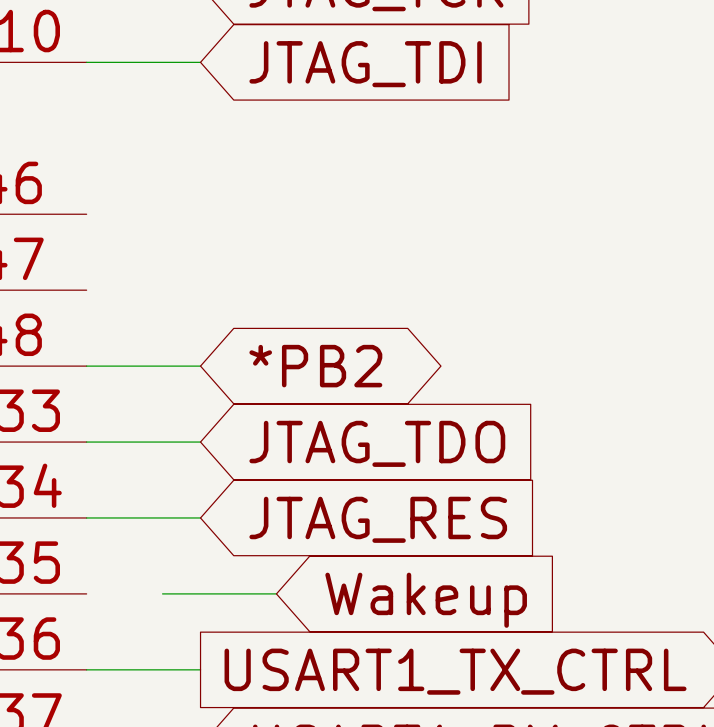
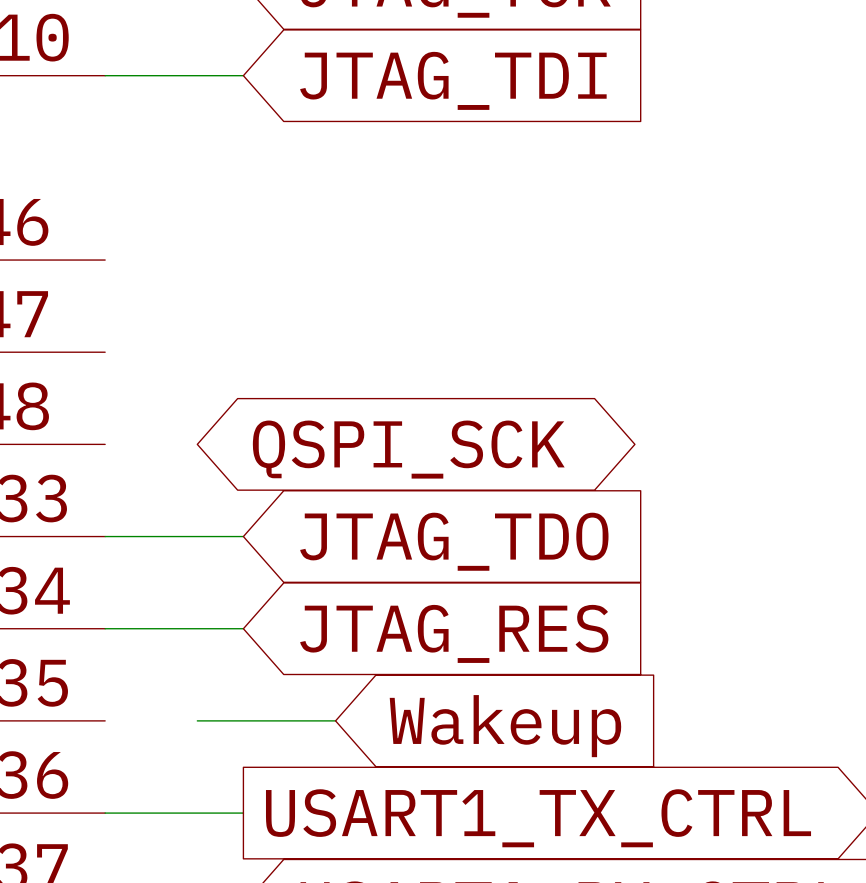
wire: (86, 366) (200, 366) -> none
global label: *PB2 (315, 366) -> none
global label: none -> QSPI_SCK (408, 449)

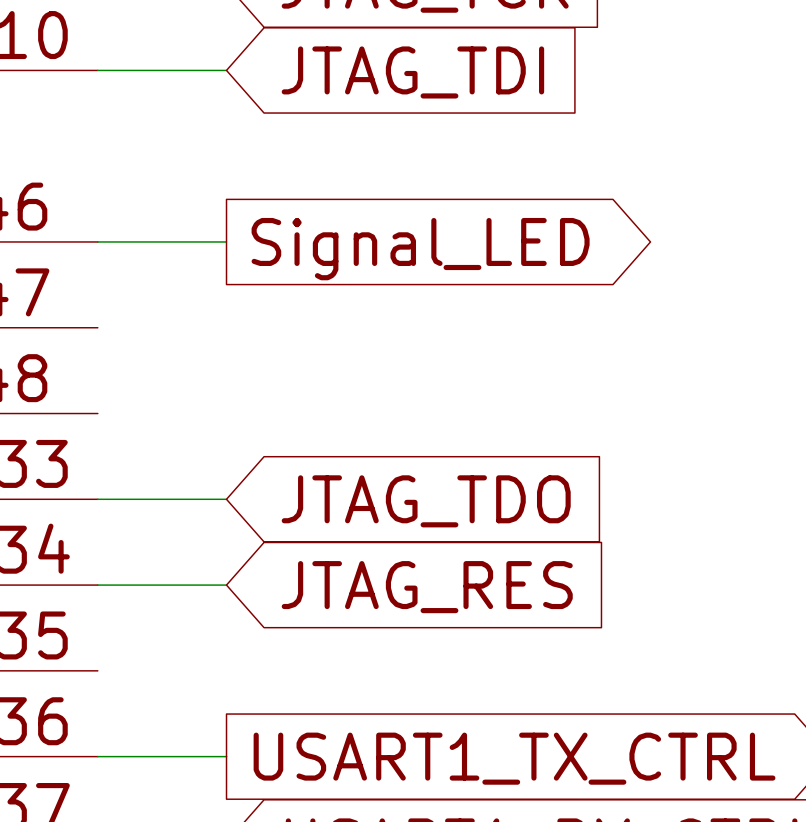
global label: none -> Signal_LED (420, 249)
global label: QSPI_SCK (408, 449) -> none
wire: (197, 720) (335, 720) -> (97, 241) (226, 241)
global label: Wakeup (505, 726) -> none

